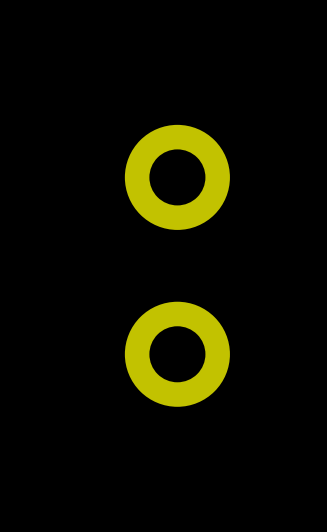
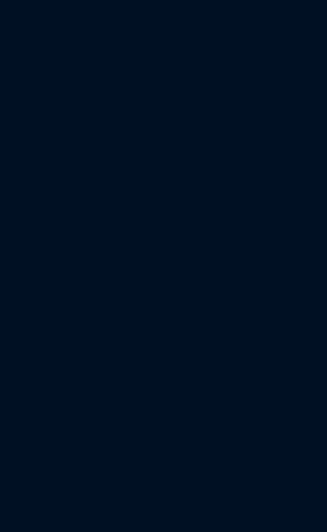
part: (177, 177) -> none
part: (177, 354) -> none

